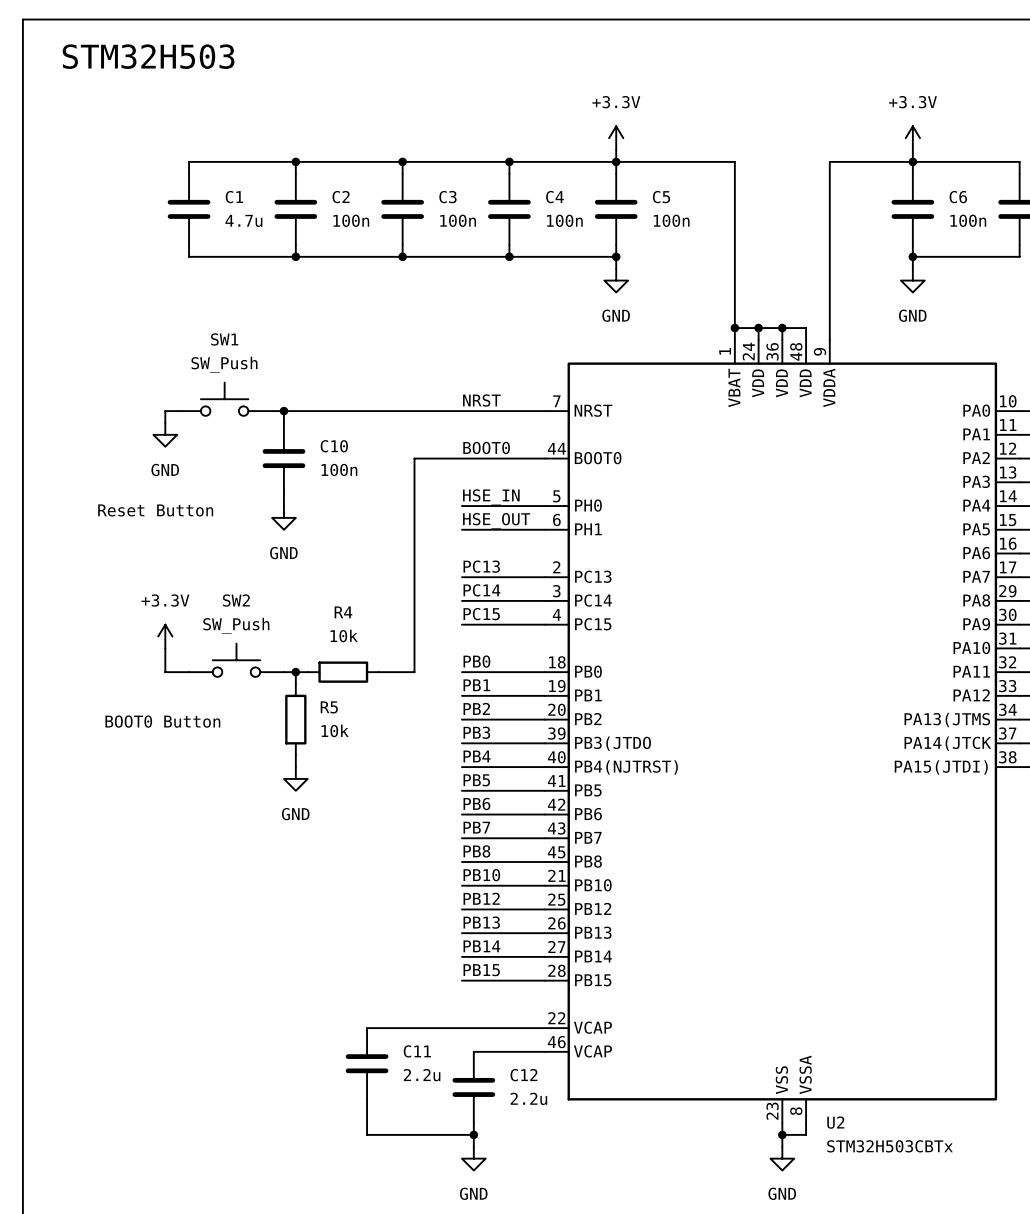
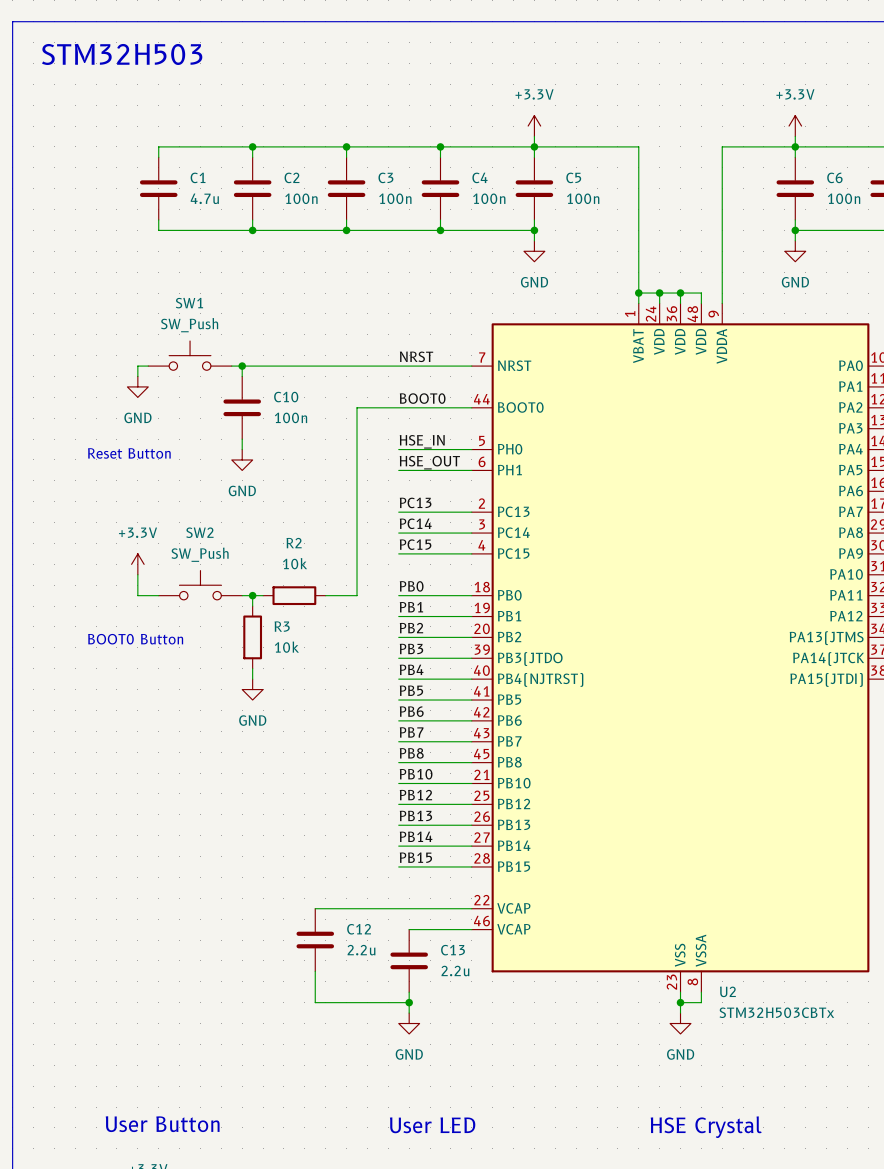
R4 name: R4 (343, 612) -> R2 (294, 543)
R5 name: R5 (329, 707) -> R3 (282, 626)
C11 name: C11 (417, 1051) -> C12 (359, 929)
C12 name: C12 (523, 1075) -> C13 (453, 950)

